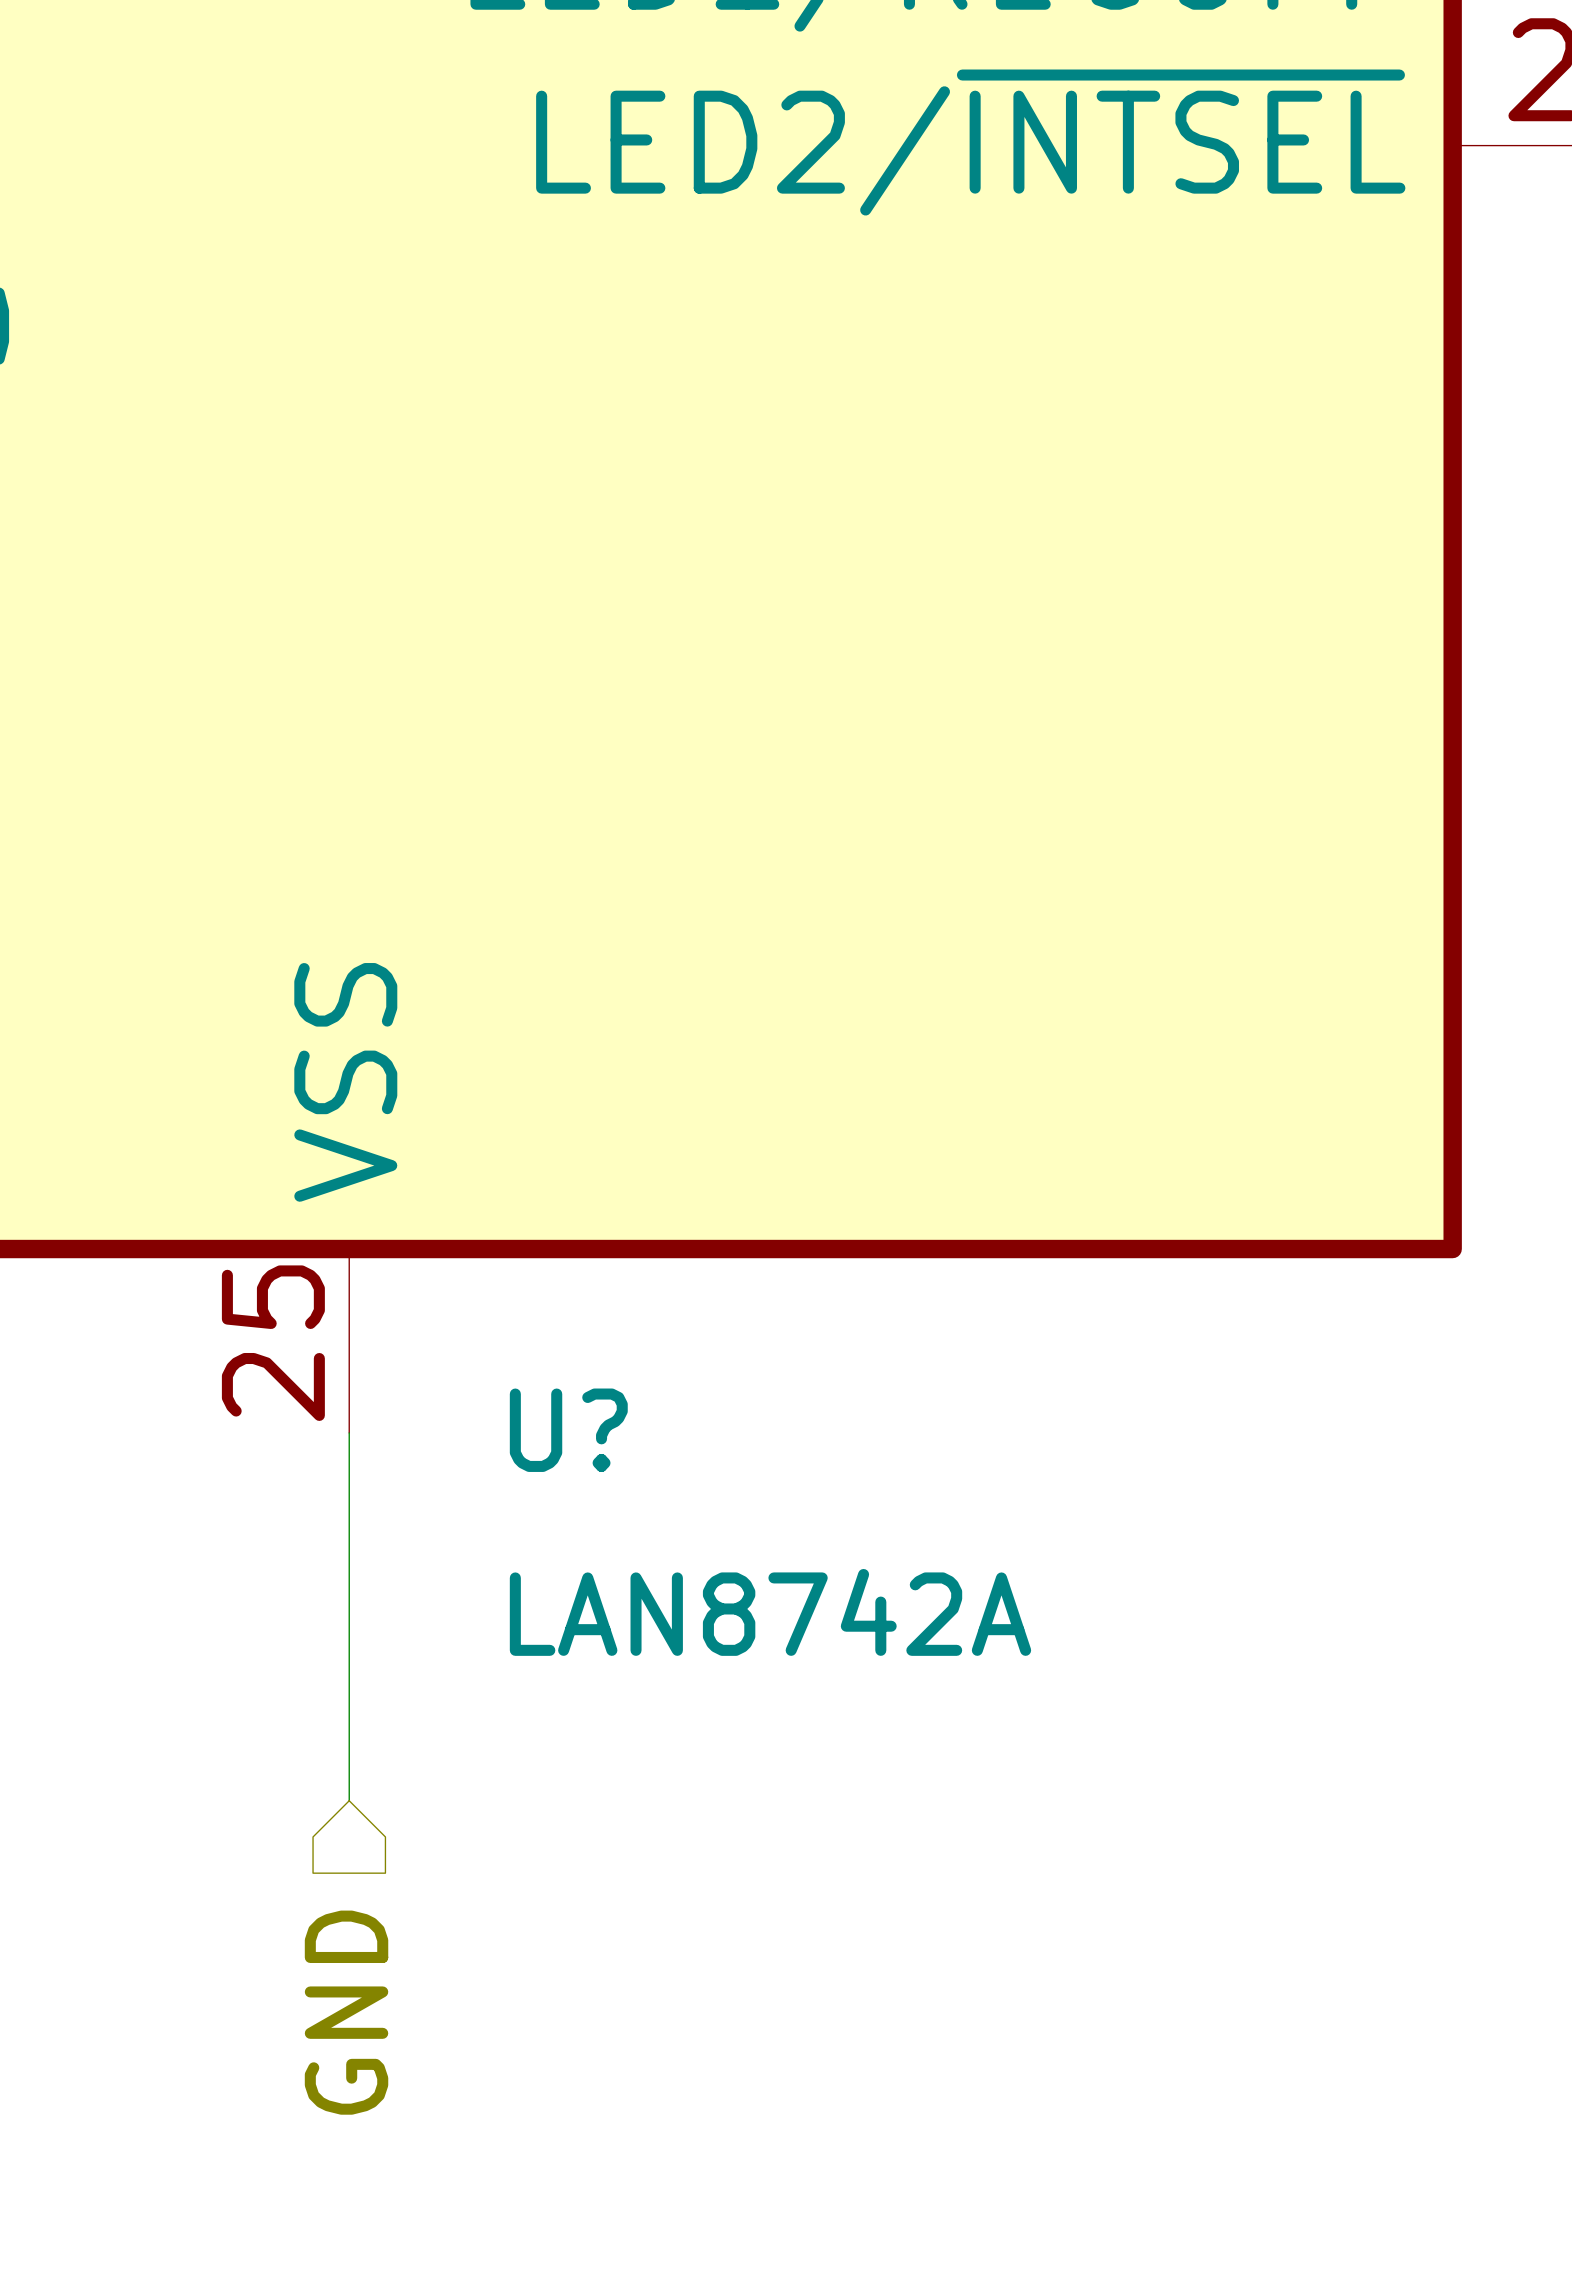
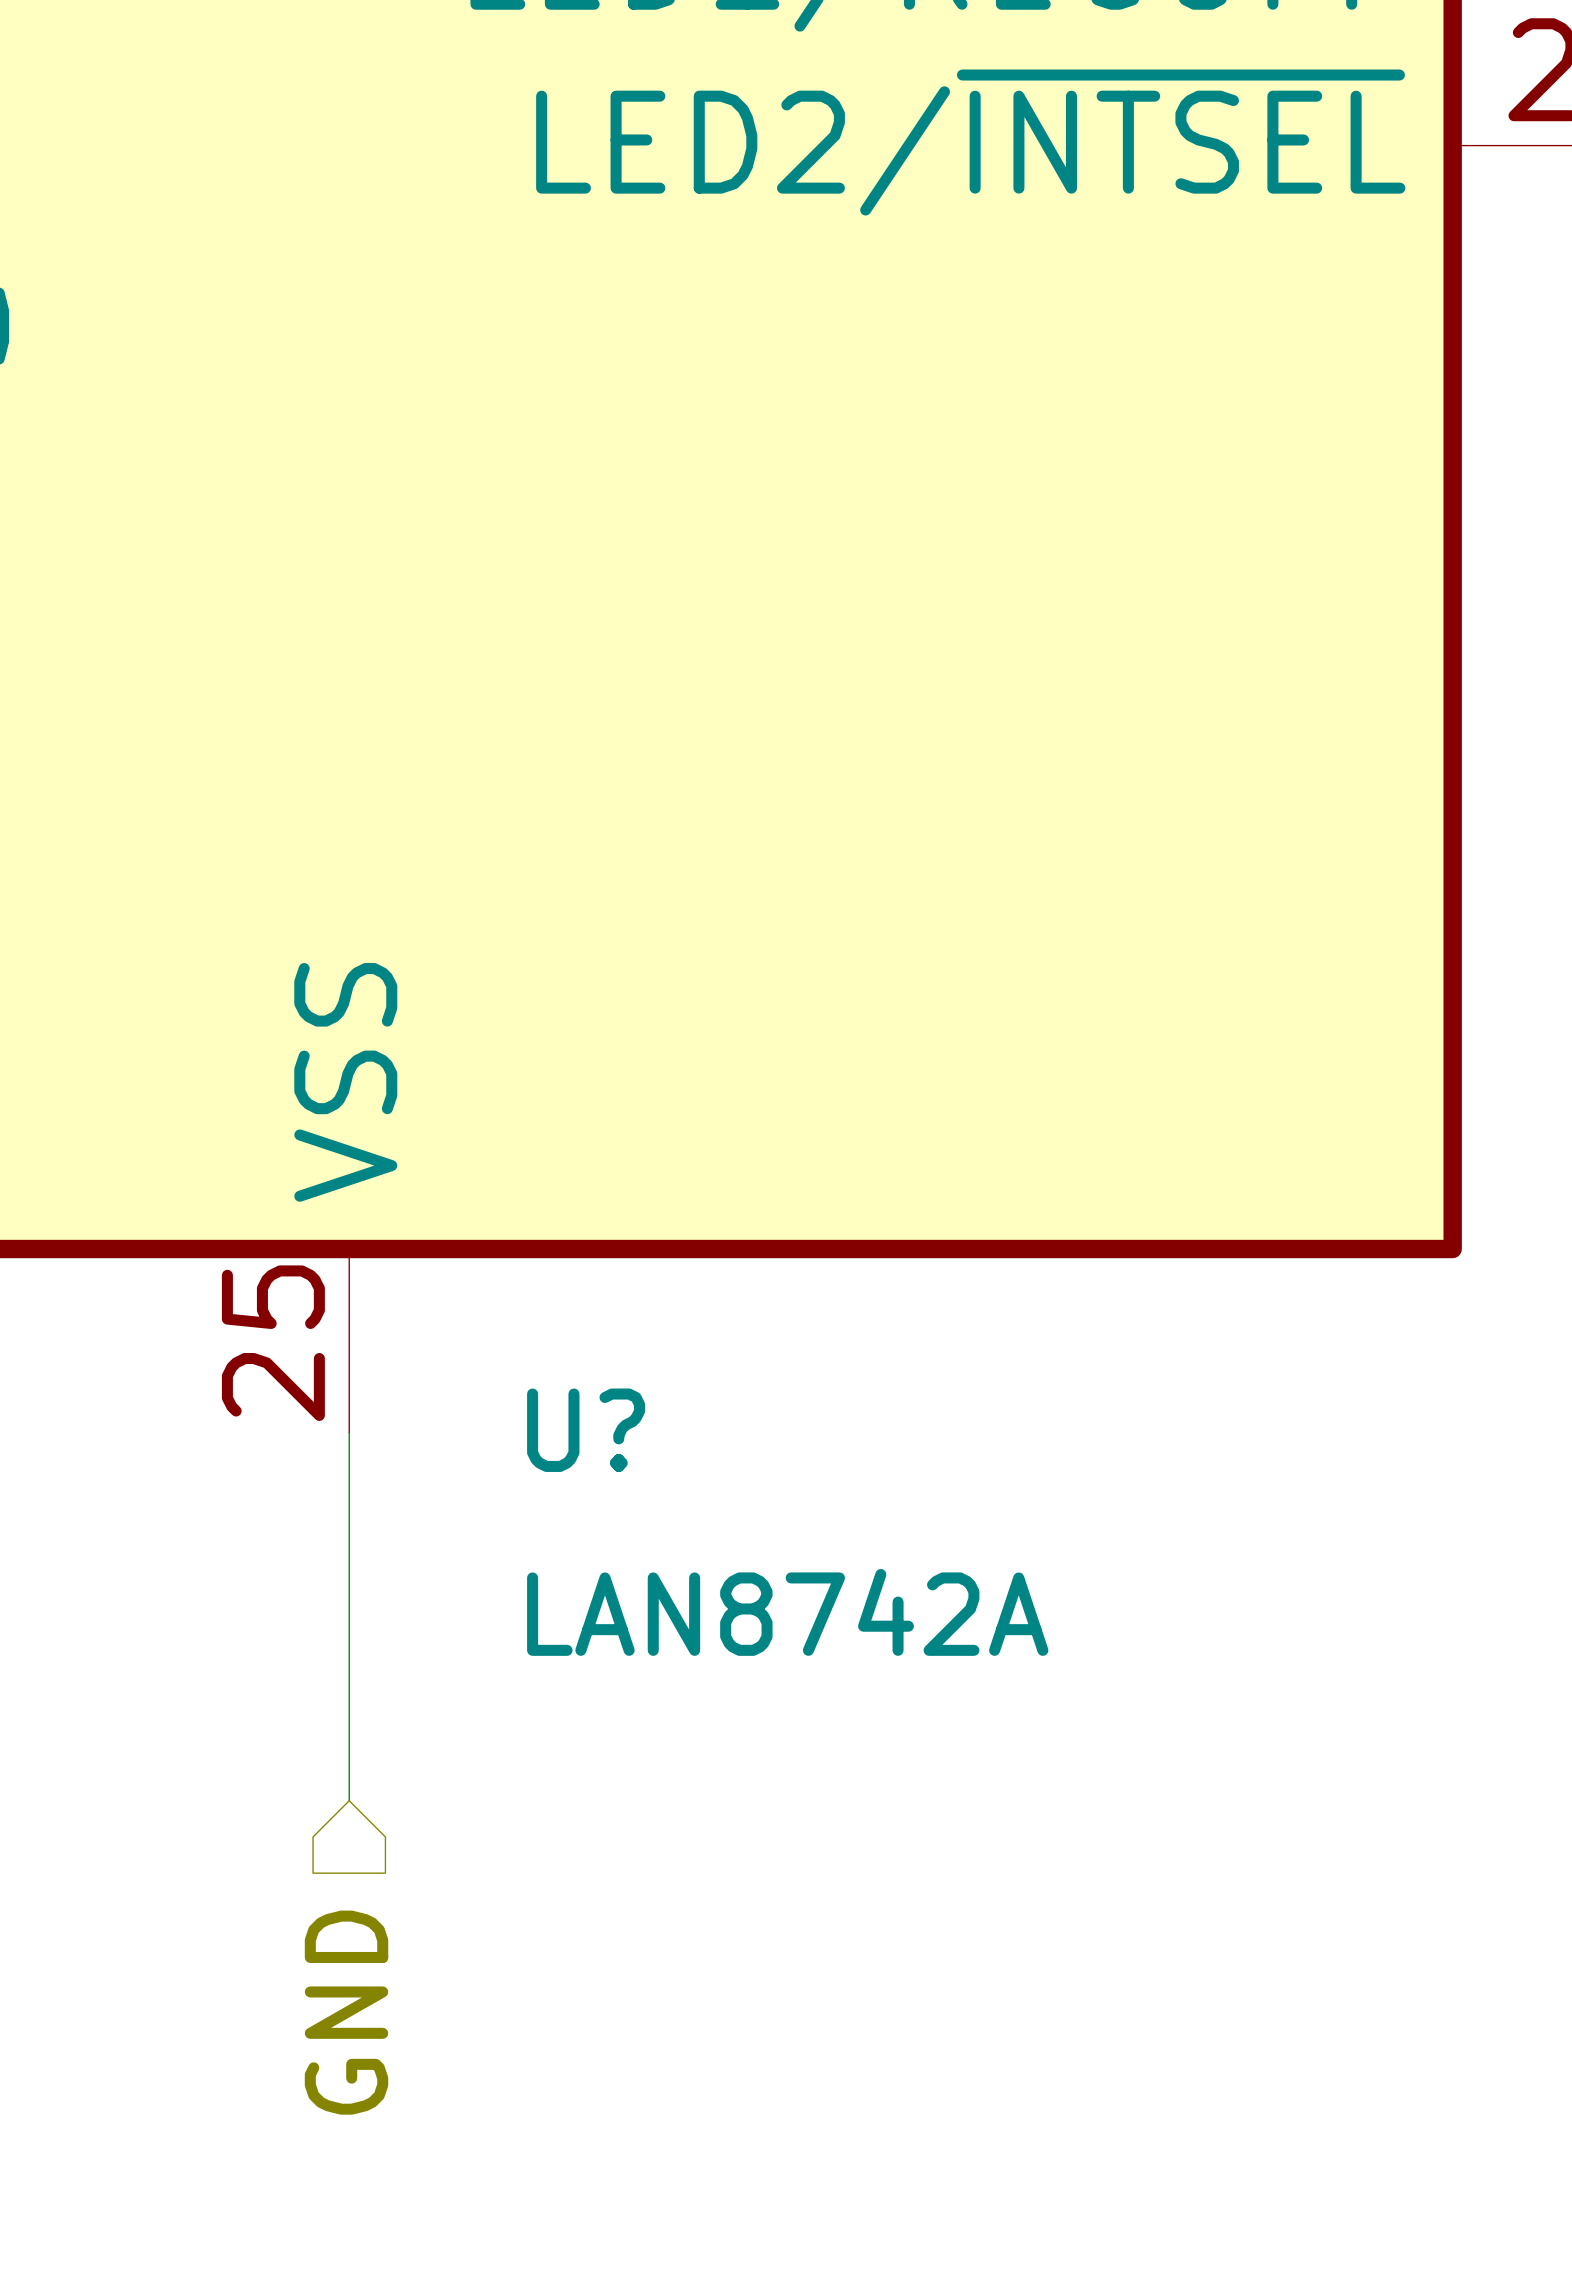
U? name position: U? (568, 1430) -> U? (586, 1430)
U? value position: LAN8742A (770, 1612) -> LAN8742A (787, 1612)

